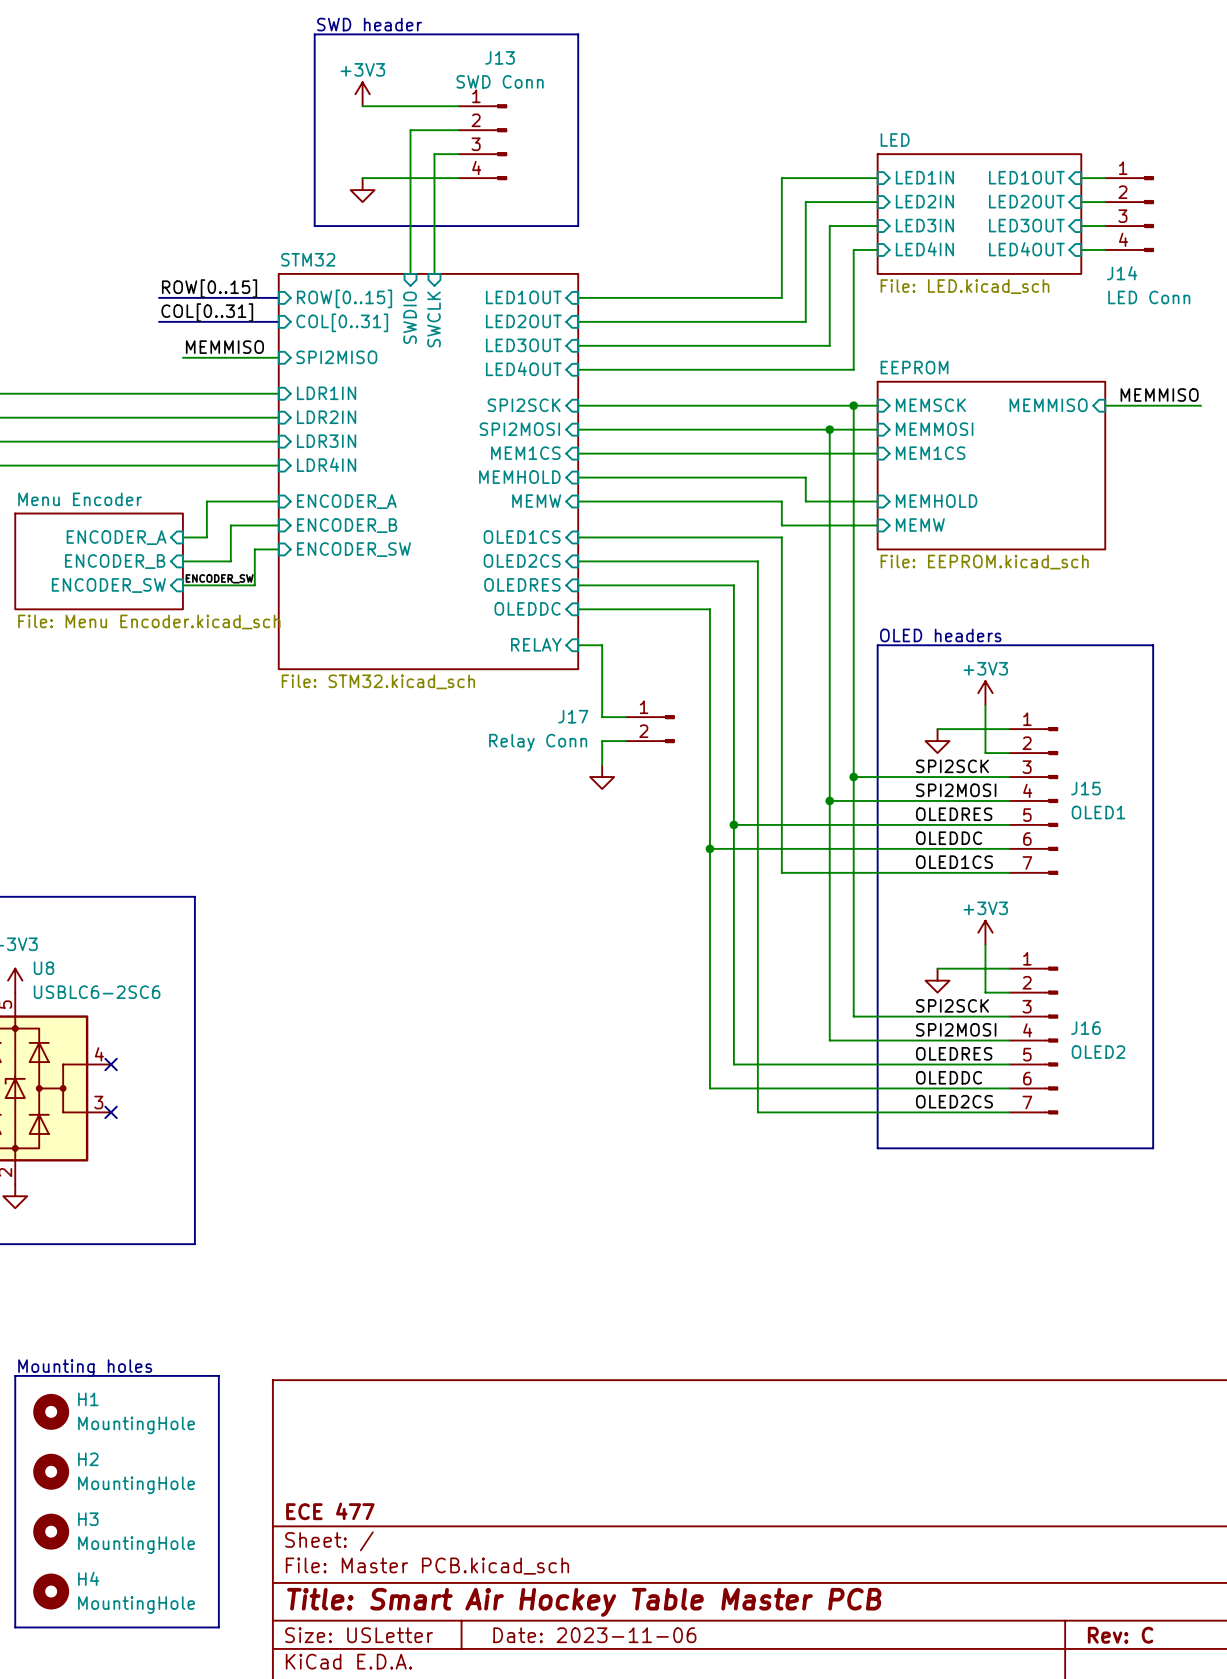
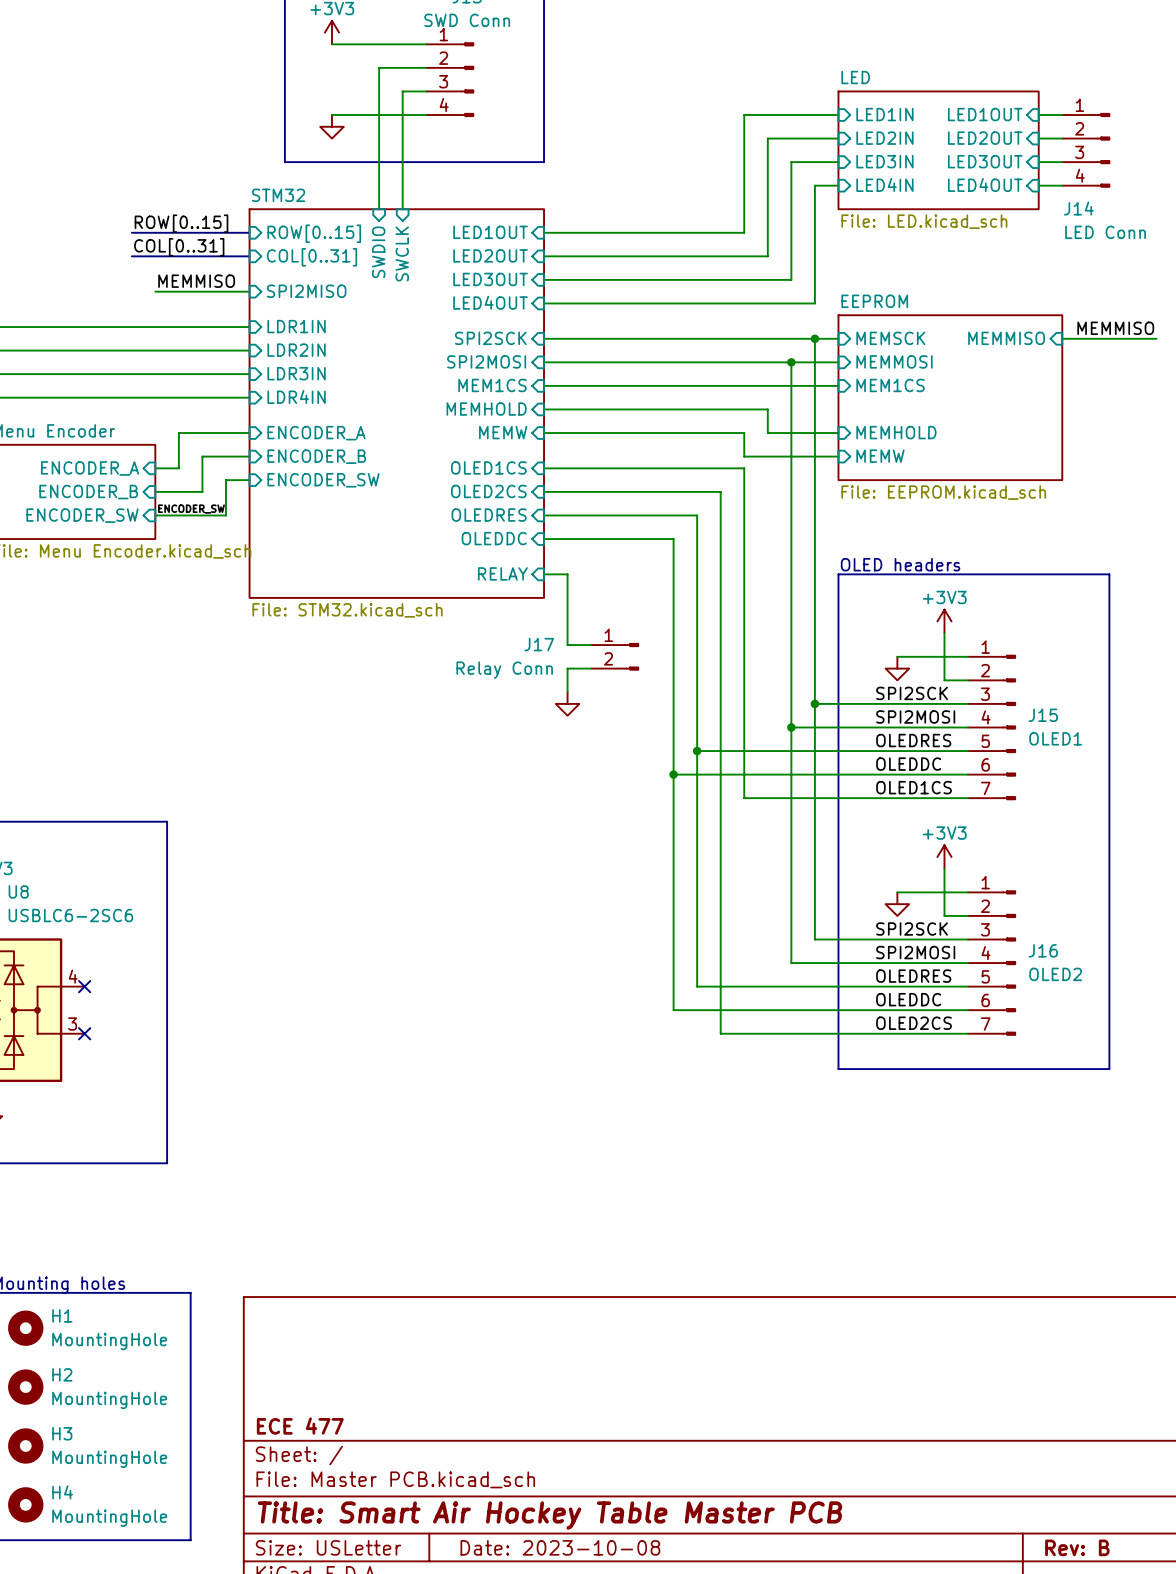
title block: Date: 2023-11-06 (594, 1635) -> Date: 2023-10-08 (560, 1547)
title block: Rev: C (1120, 1635) -> Rev: B (1077, 1547)

